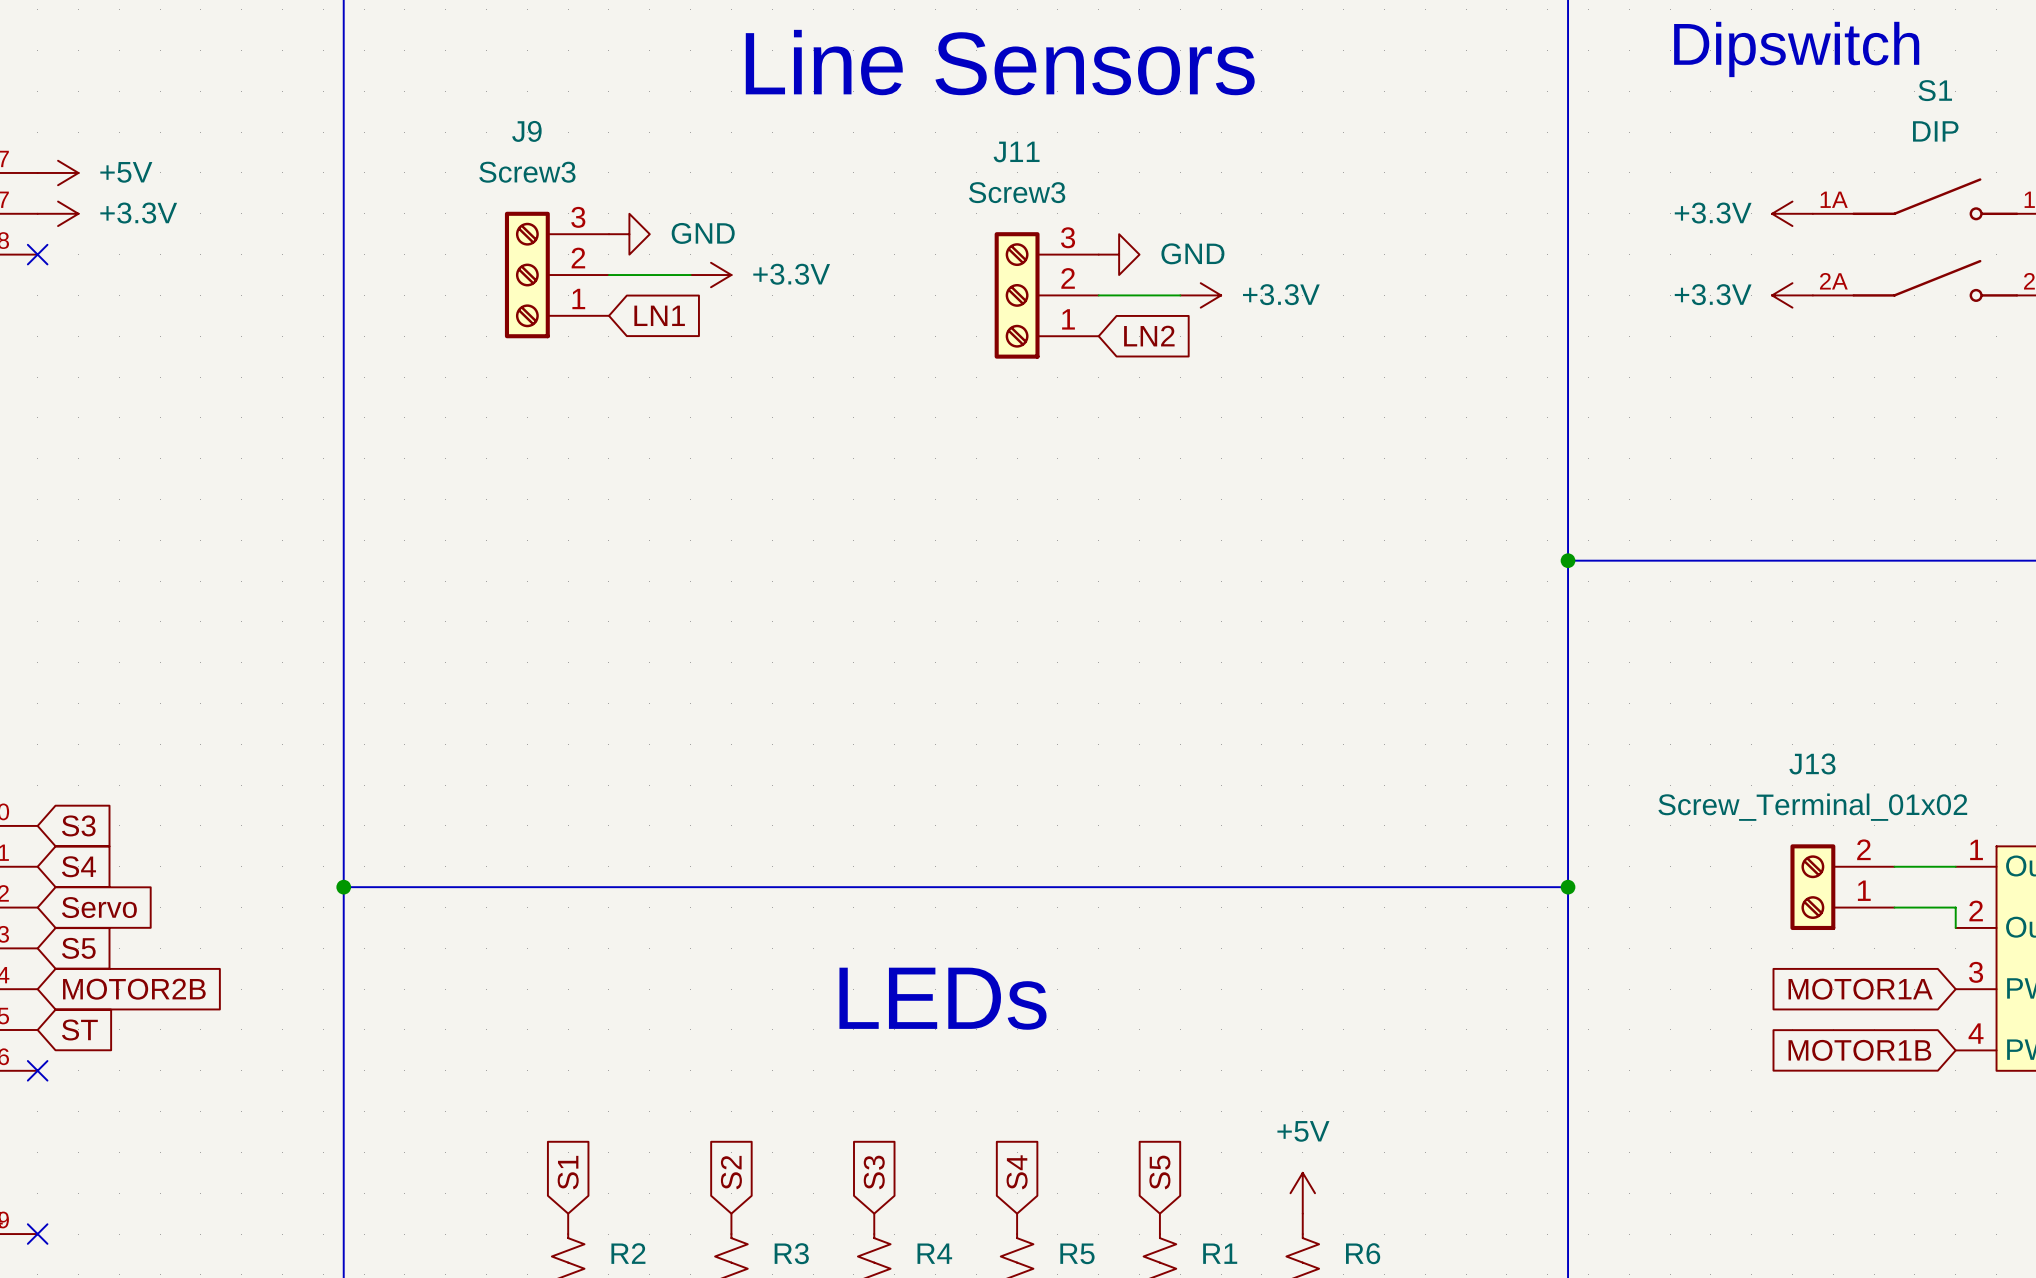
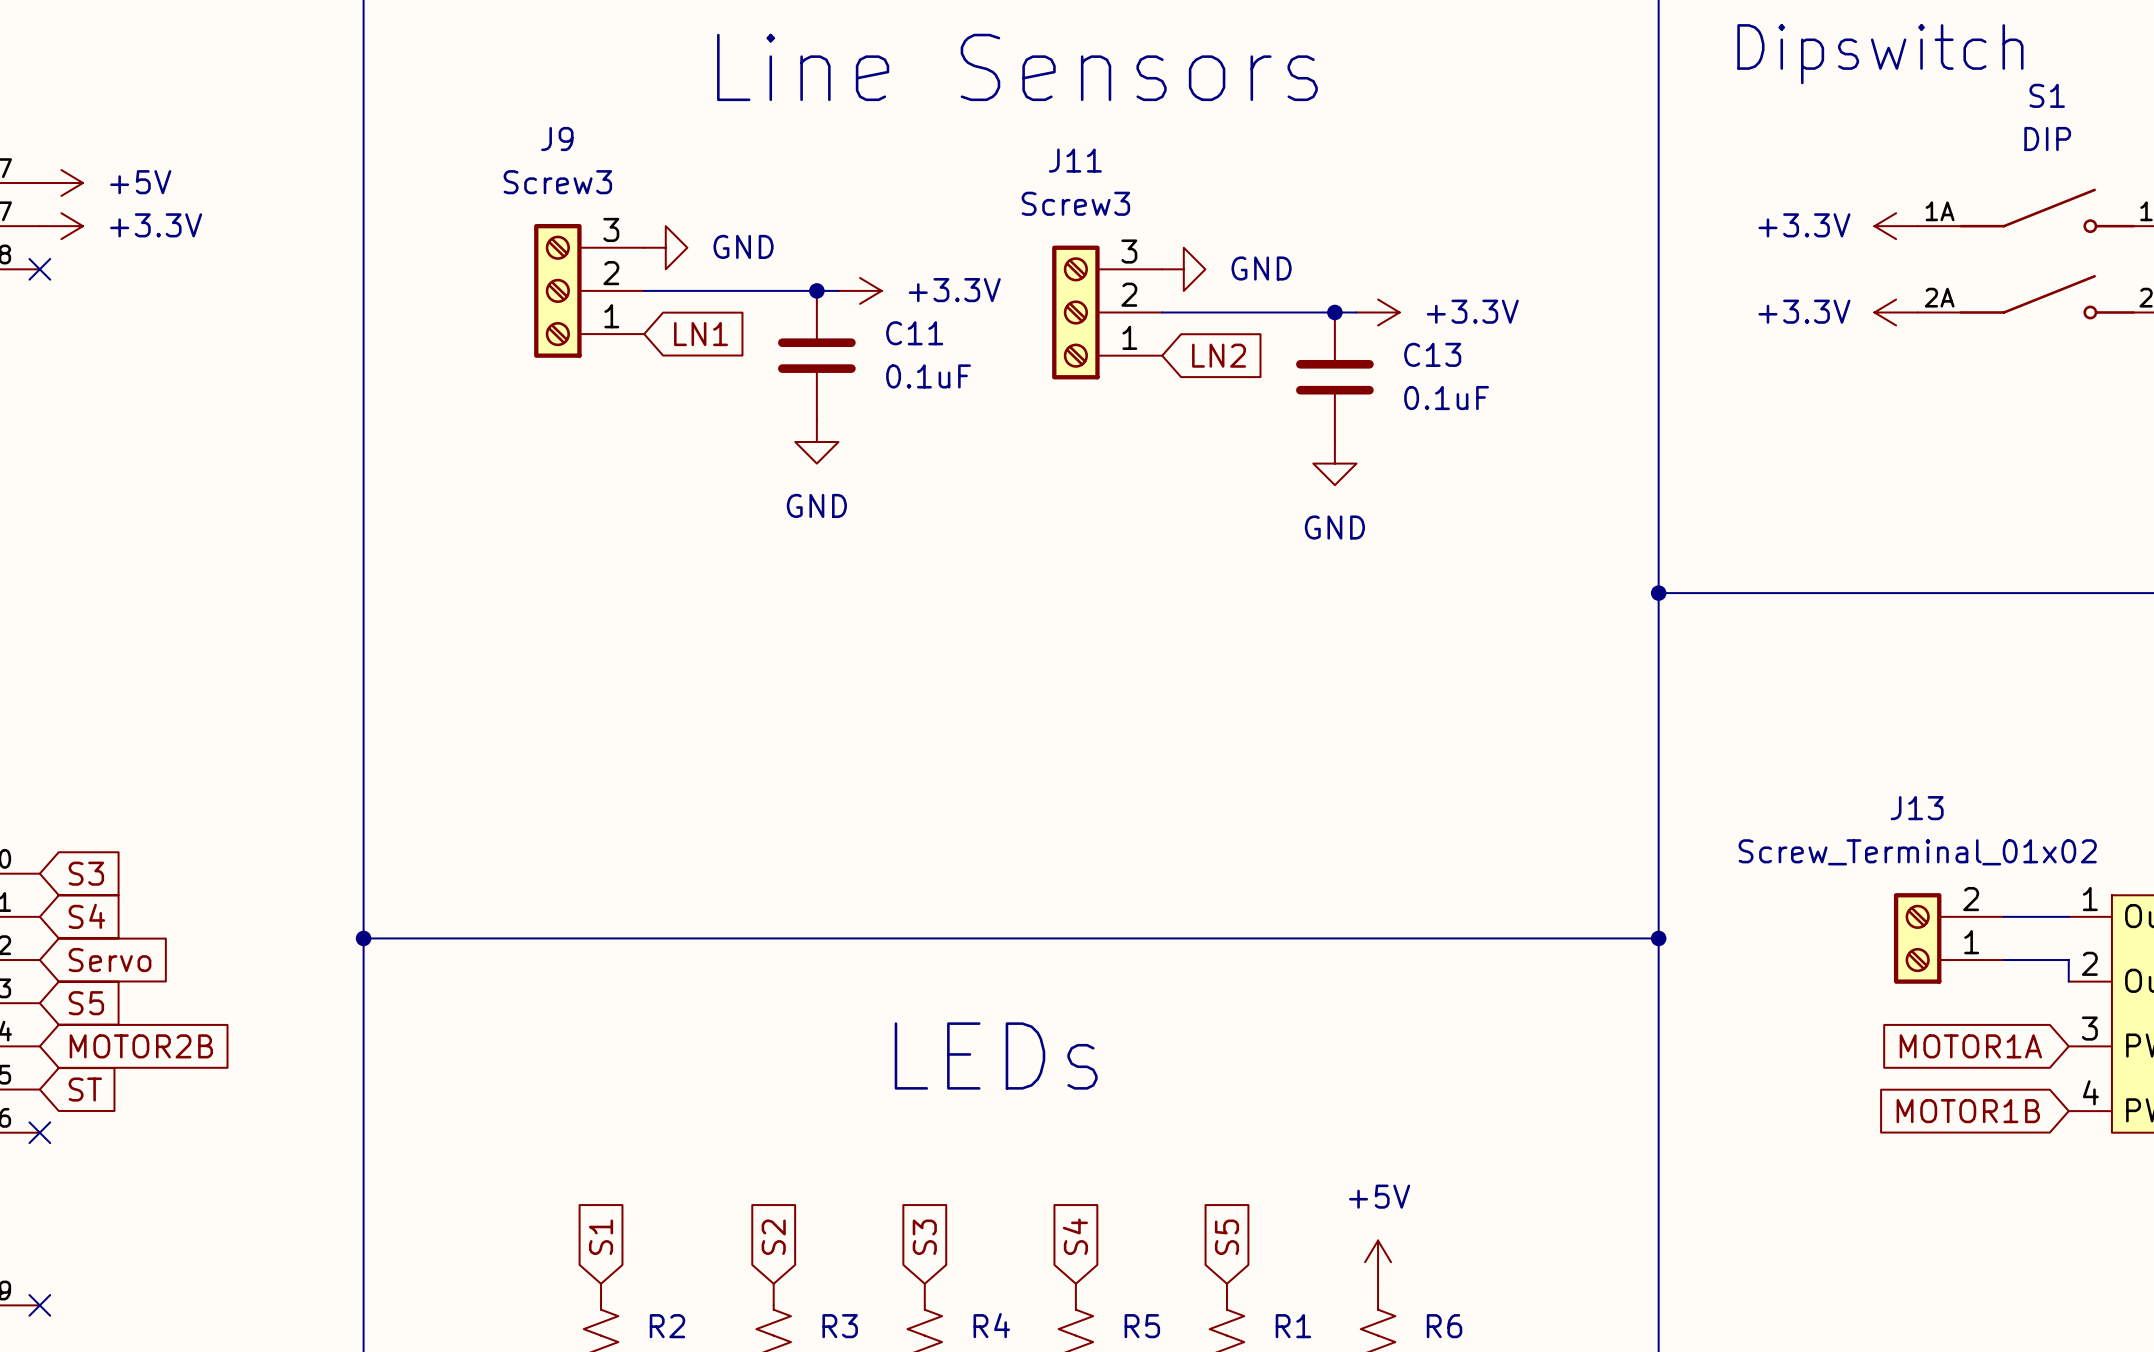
wire: none -> (730, 290) (838, 290)
power symbol position: +3.3V (711, 275) -> +3.3V (860, 290)
junction: none -> (816, 290)
wire: none -> (1248, 312) (1356, 312)
power symbol position: +3.3V (1200, 295) -> +3.3V (1378, 312)
junction: none -> (1334, 312)
C11: none -> 0.1uF (816, 355)
C13: none -> 0.1uF (1334, 377)
power symbol: none -> GND (816, 442)
power symbol: none -> GND (1334, 463)

